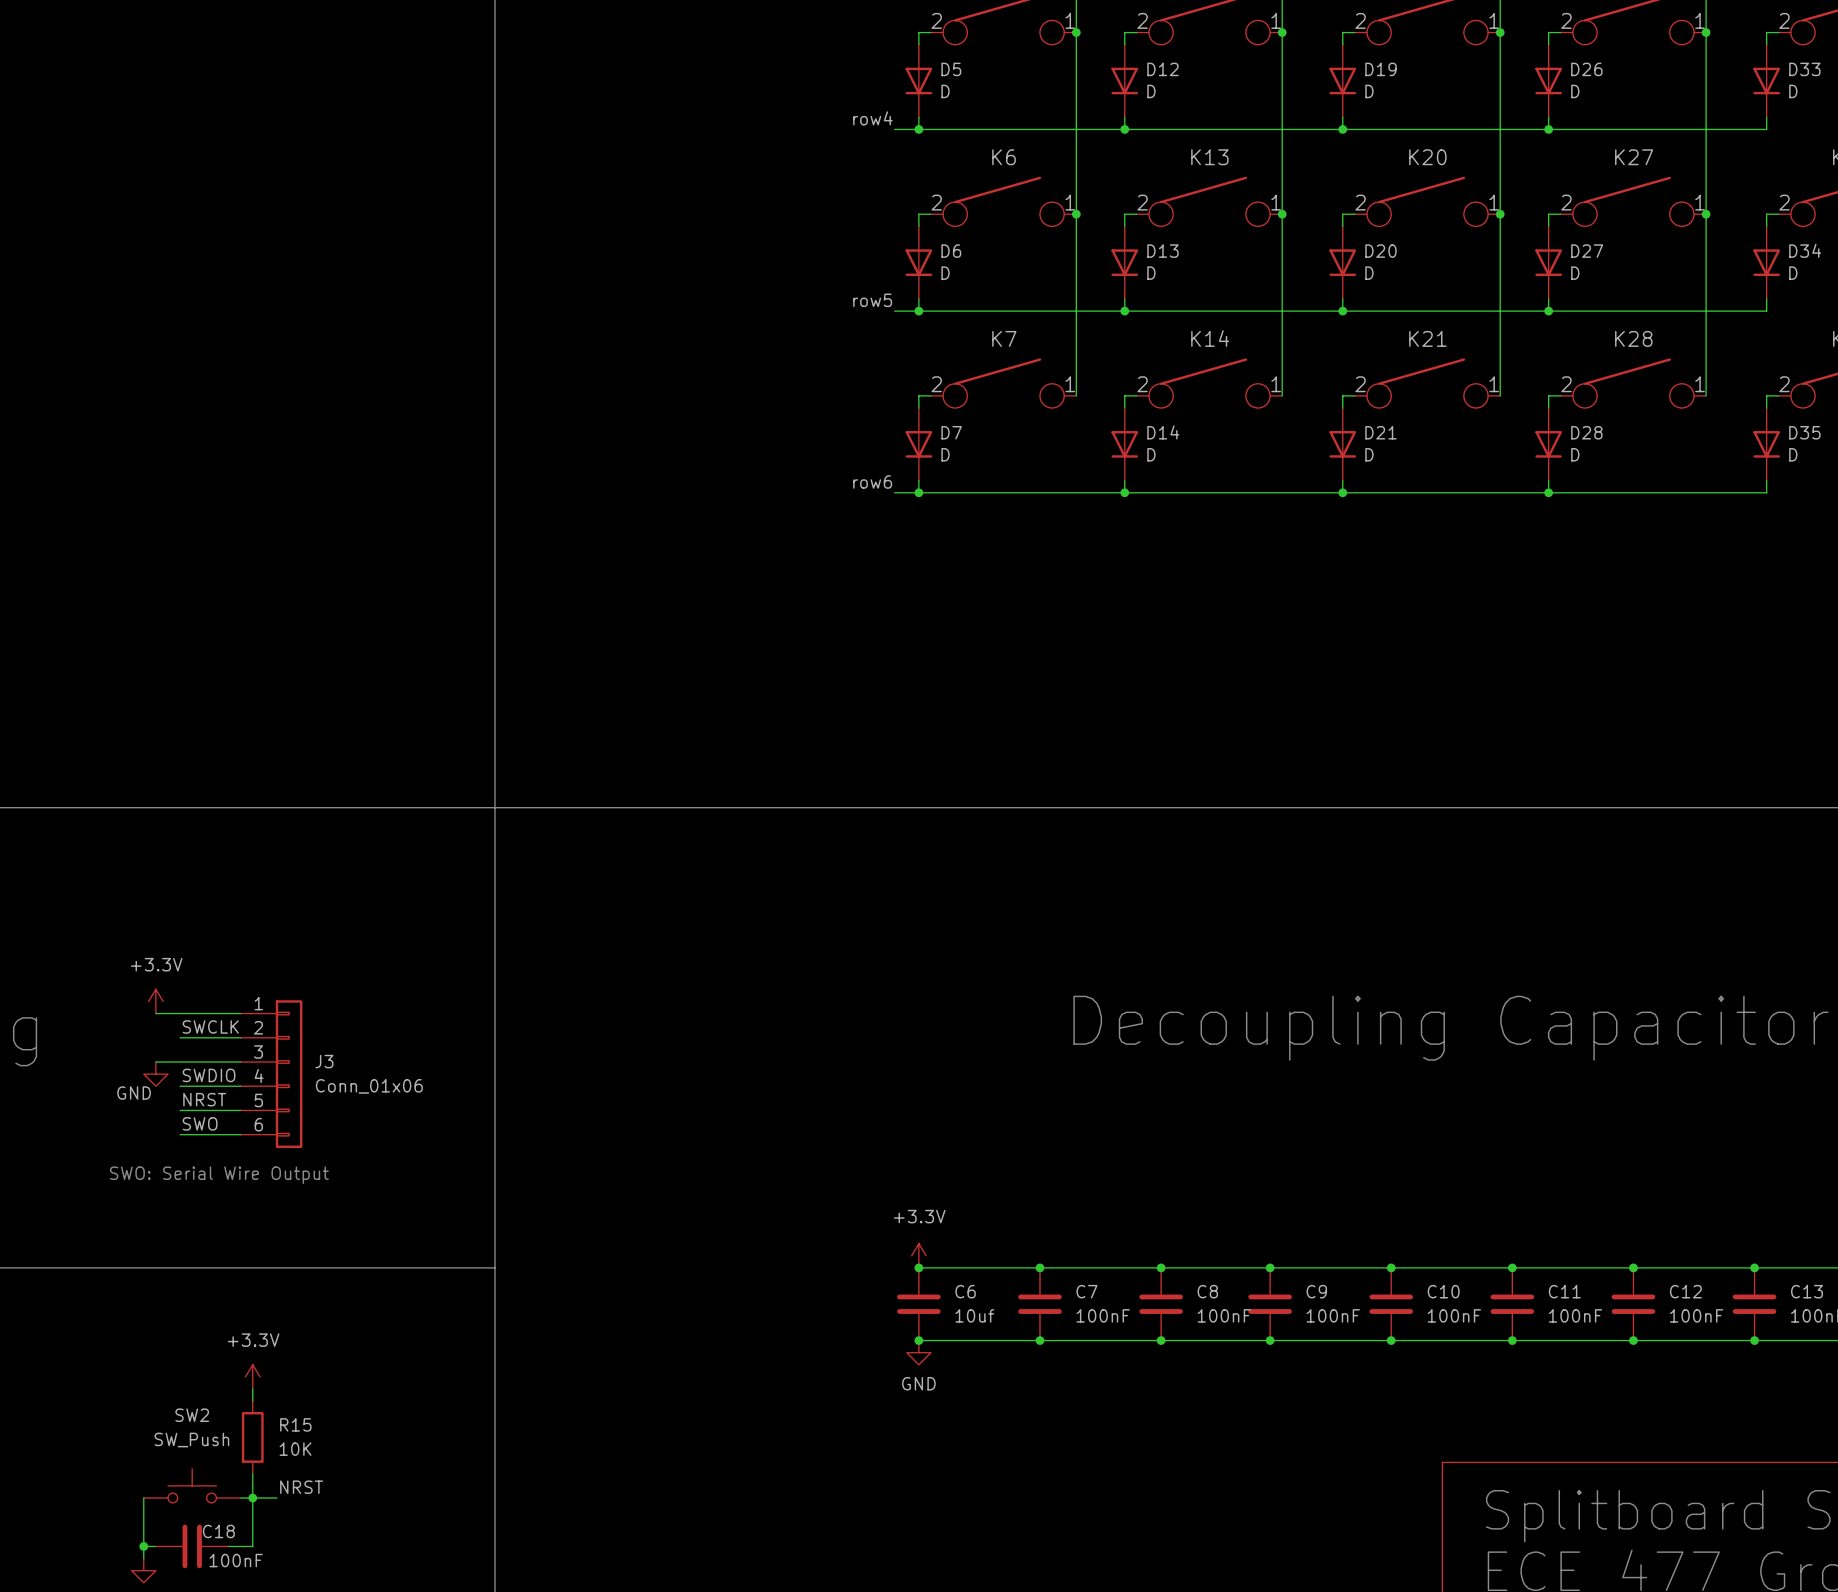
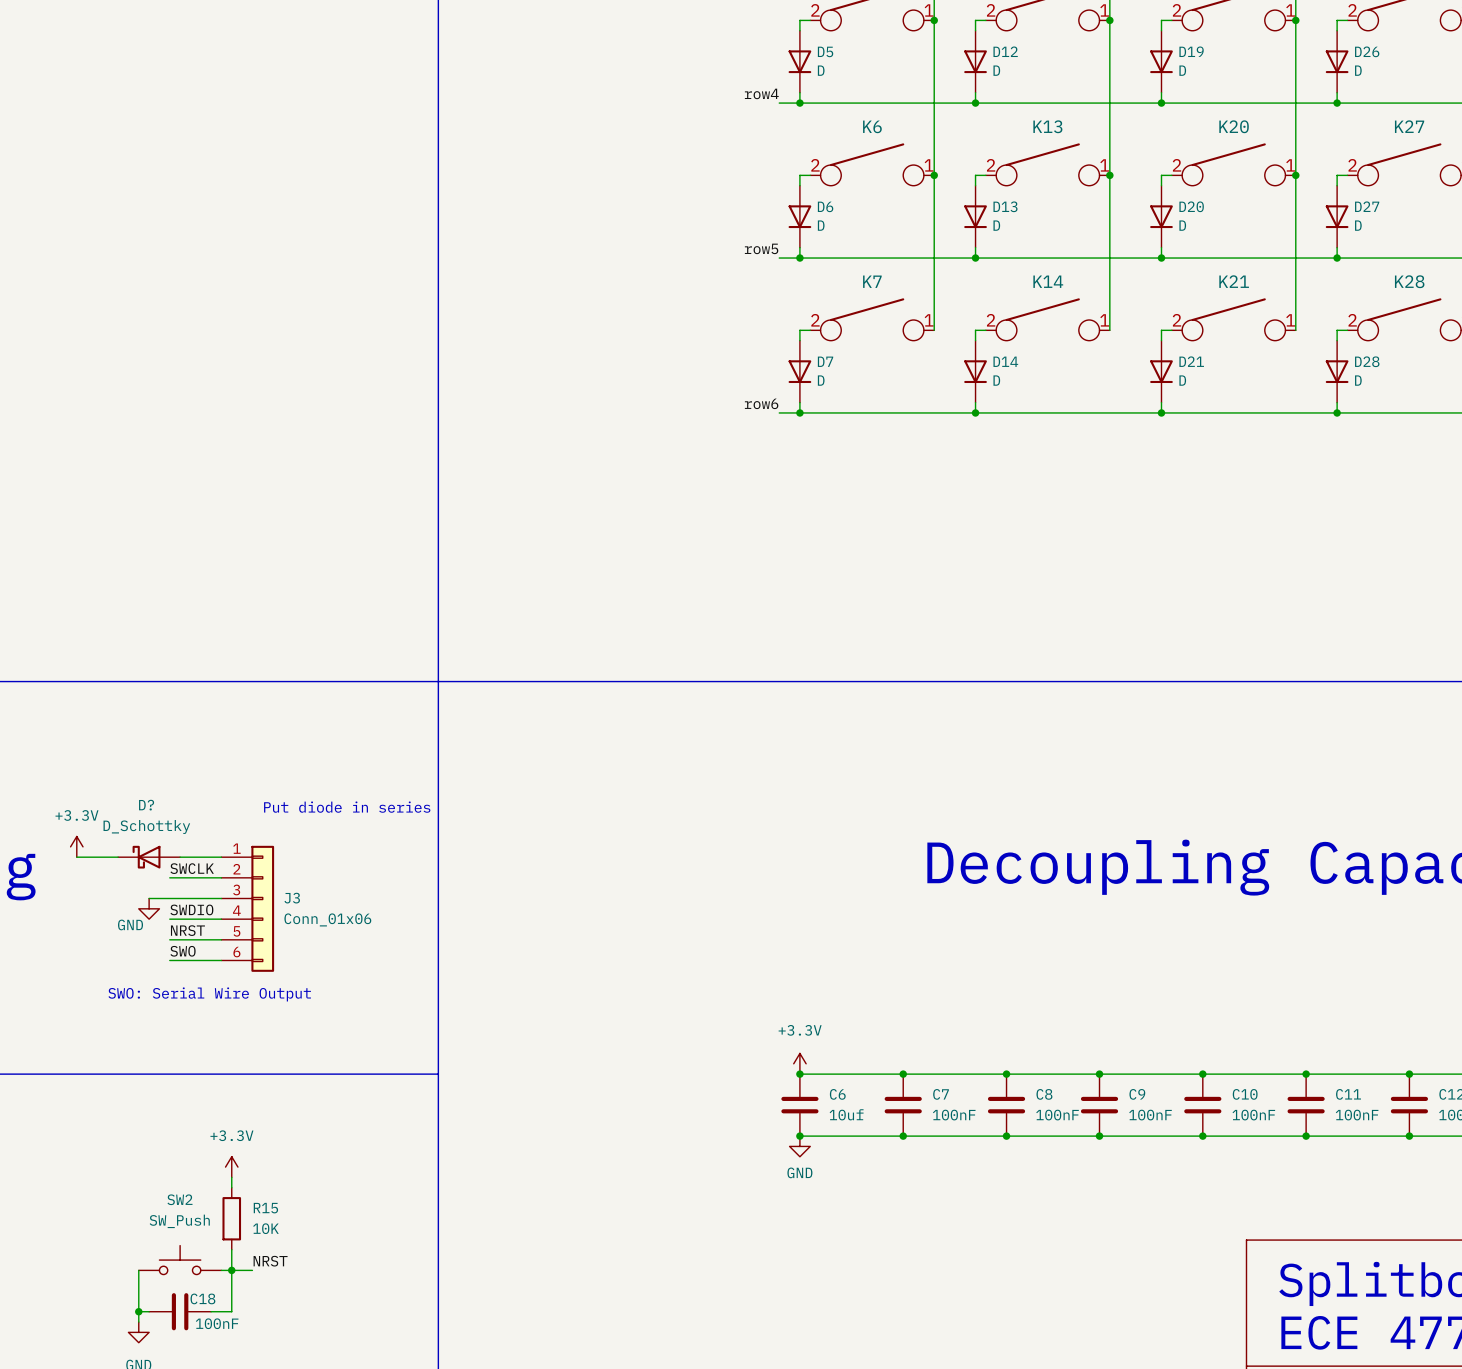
text: none -> Put diode in series (347, 807)
power symbol position: +3.3V (155, 1001) -> +3.3V (76, 846)
wire: none -> (76, 857) (118, 857)
D?: none -> D_Schottky (149, 857)

